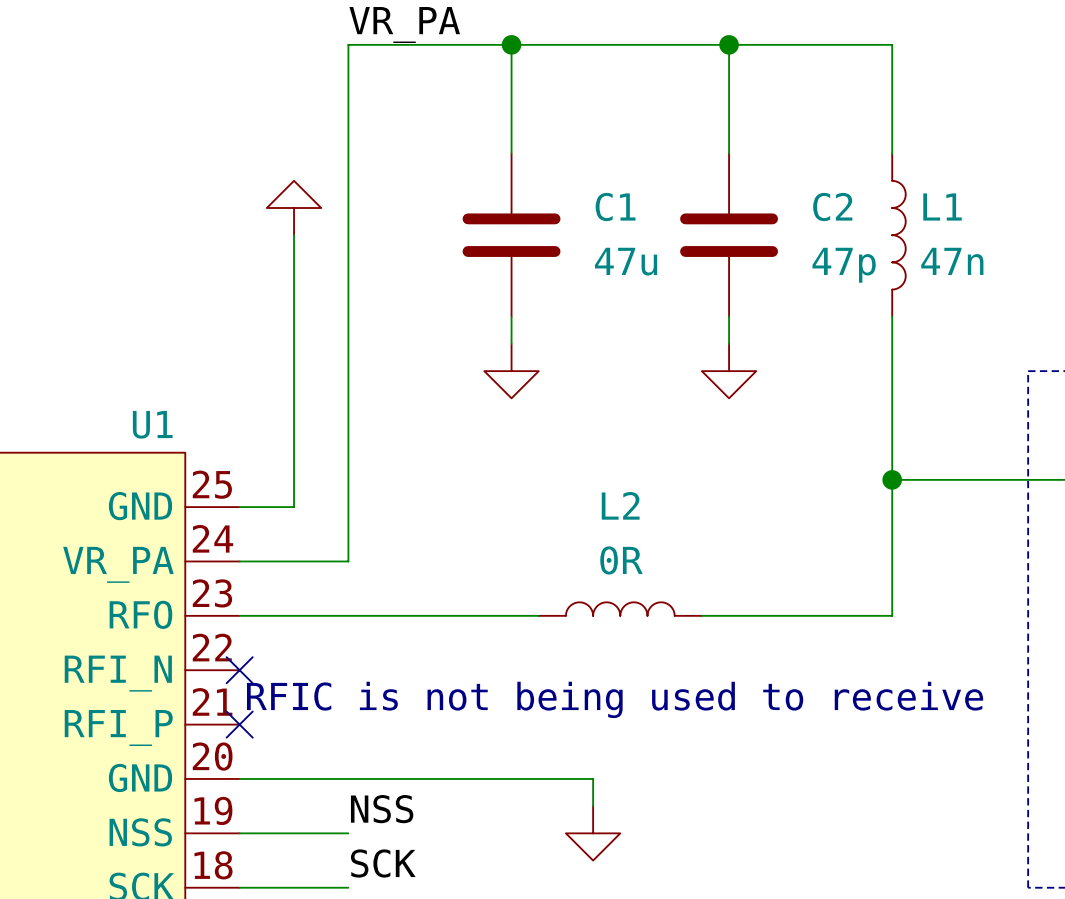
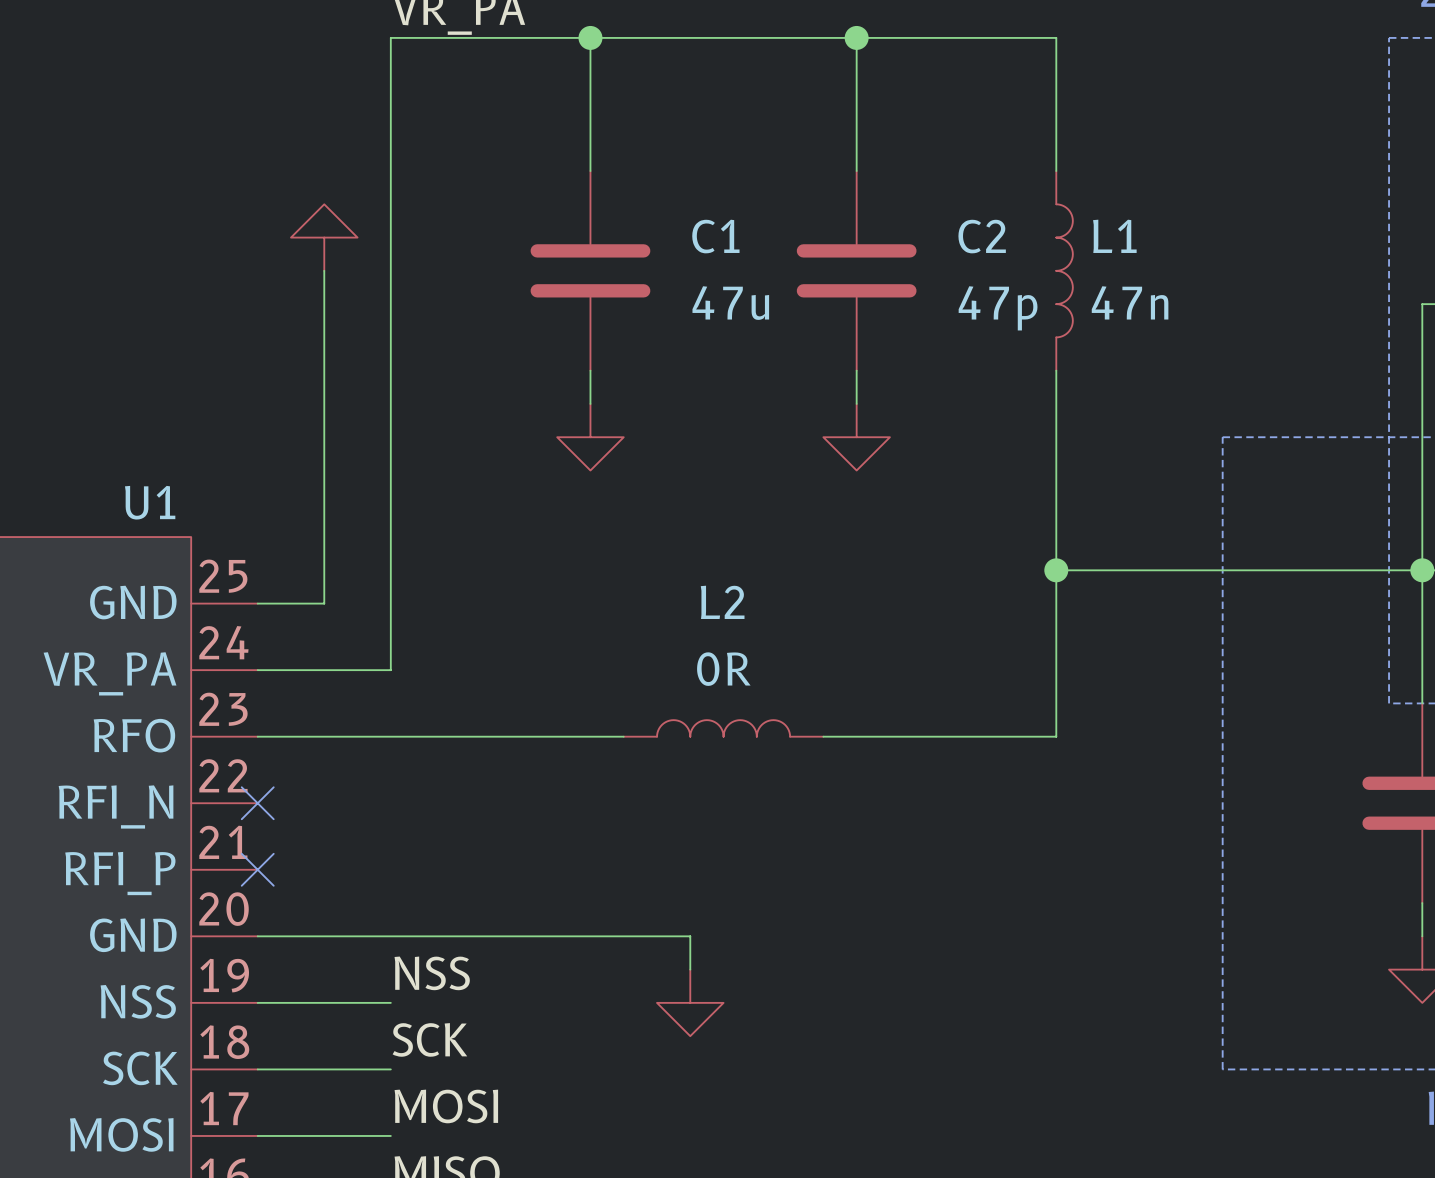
text: RFIC is not being used to receive (615, 699) -> none

